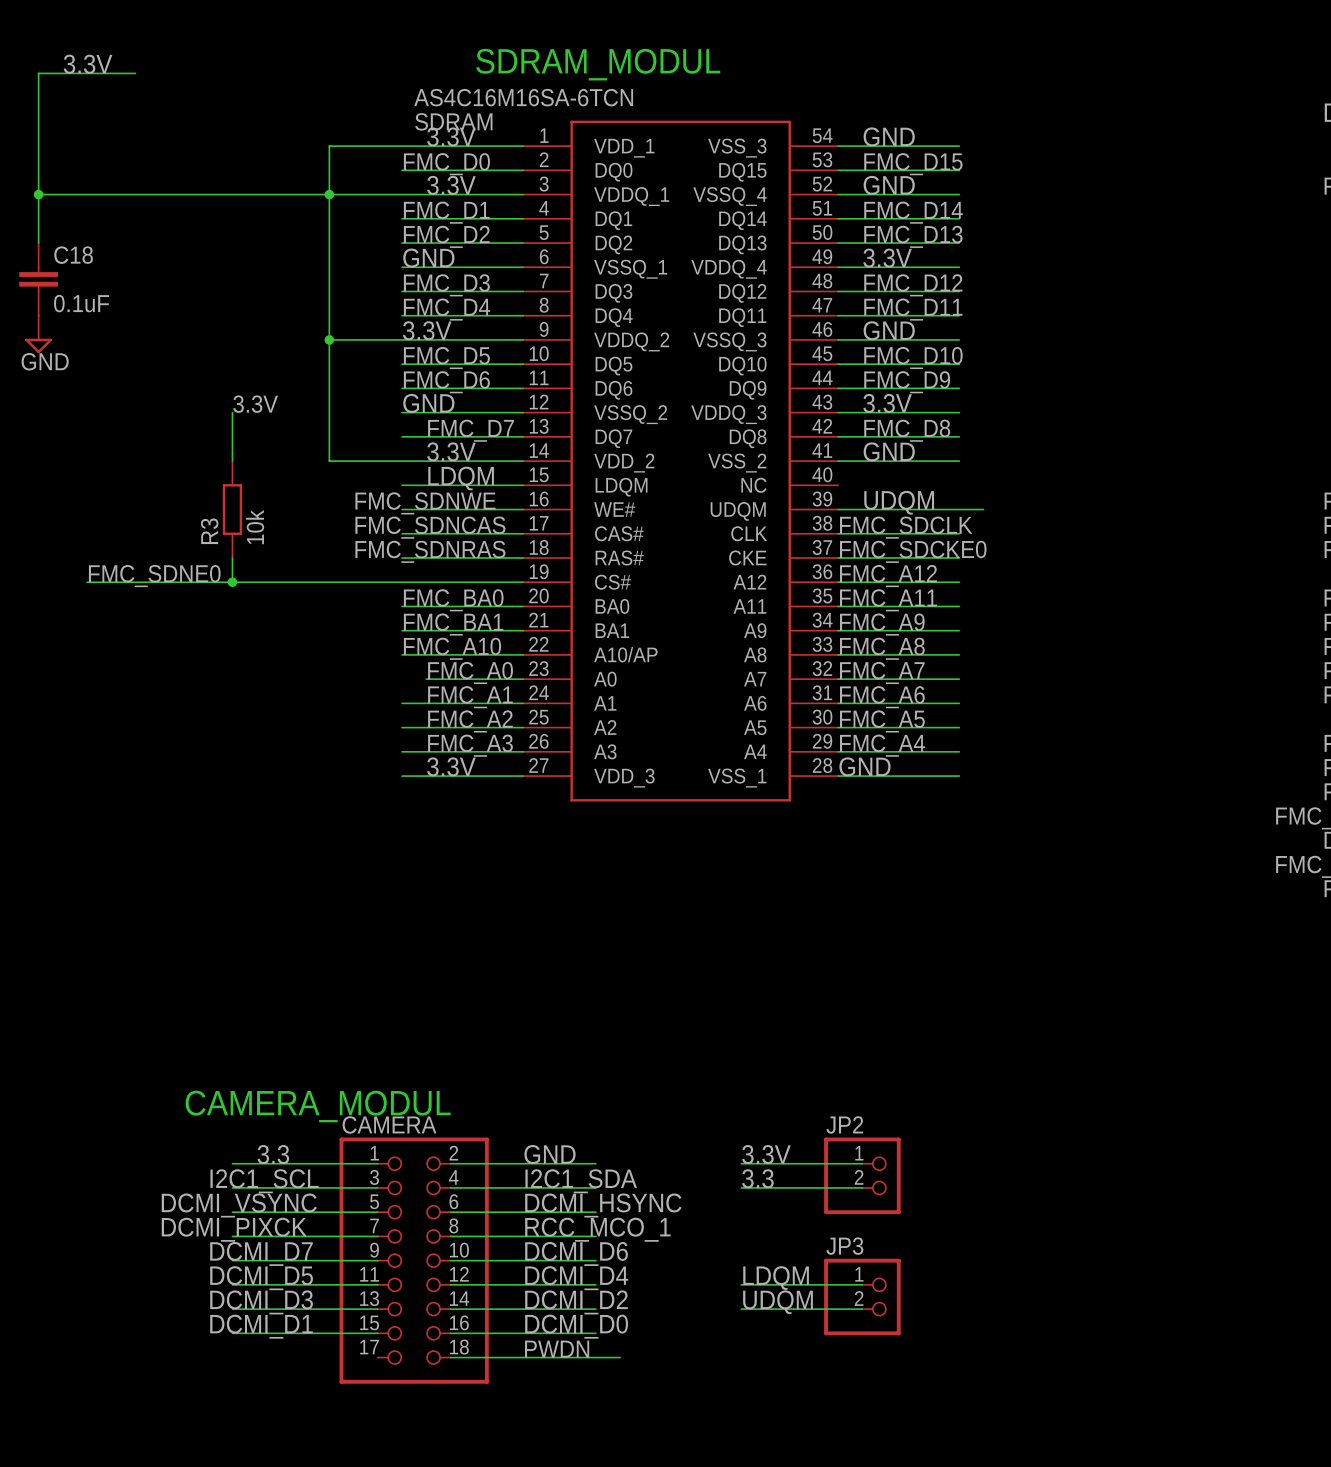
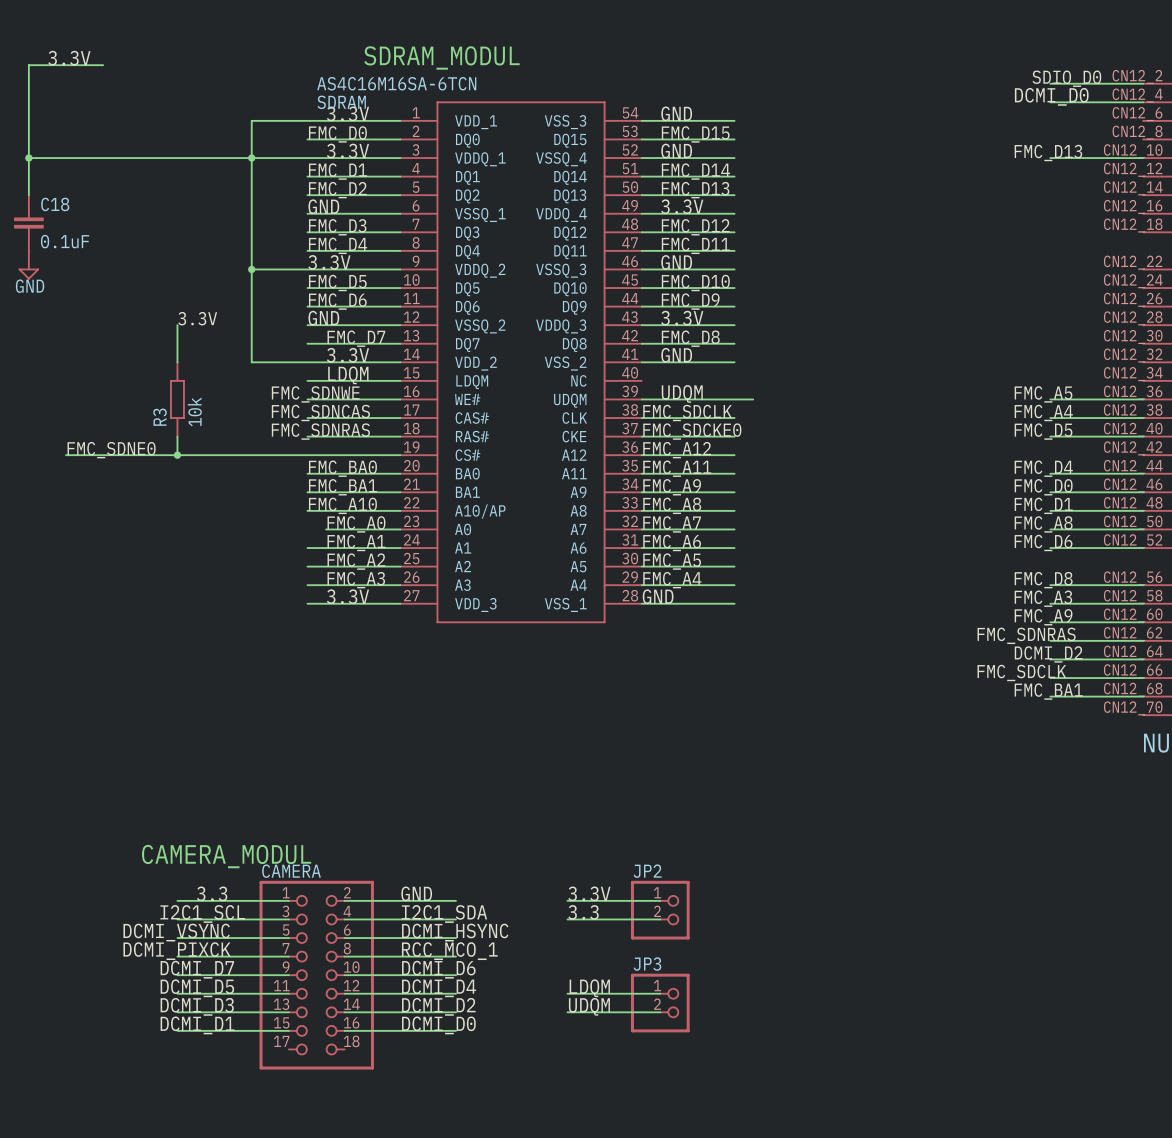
label: PWDN (557, 1349) -> none
wire: (450, 1357) (620, 1357) -> none

